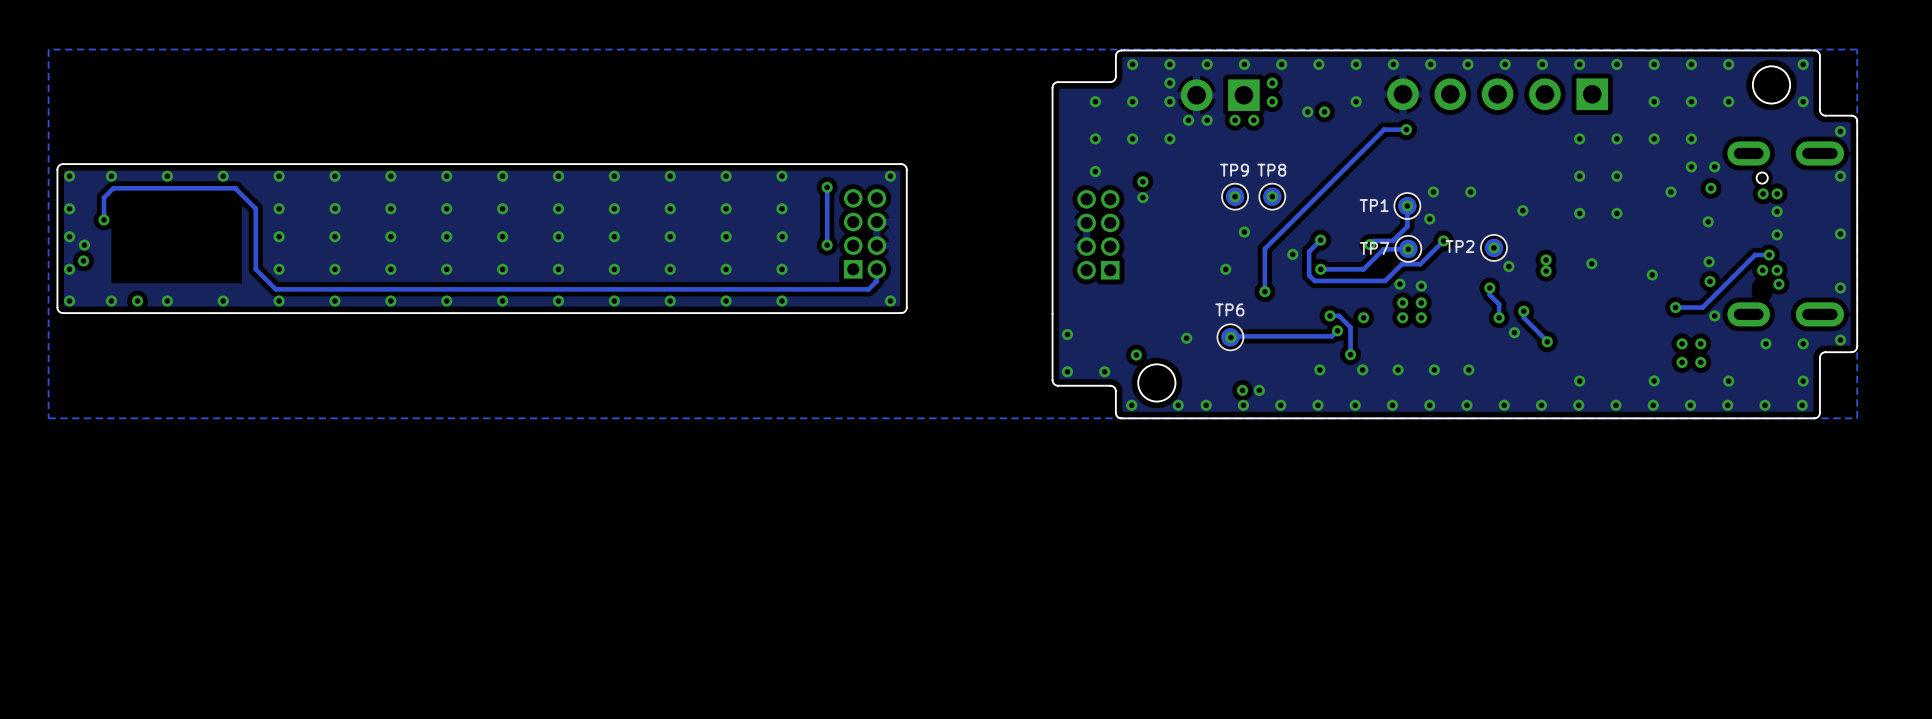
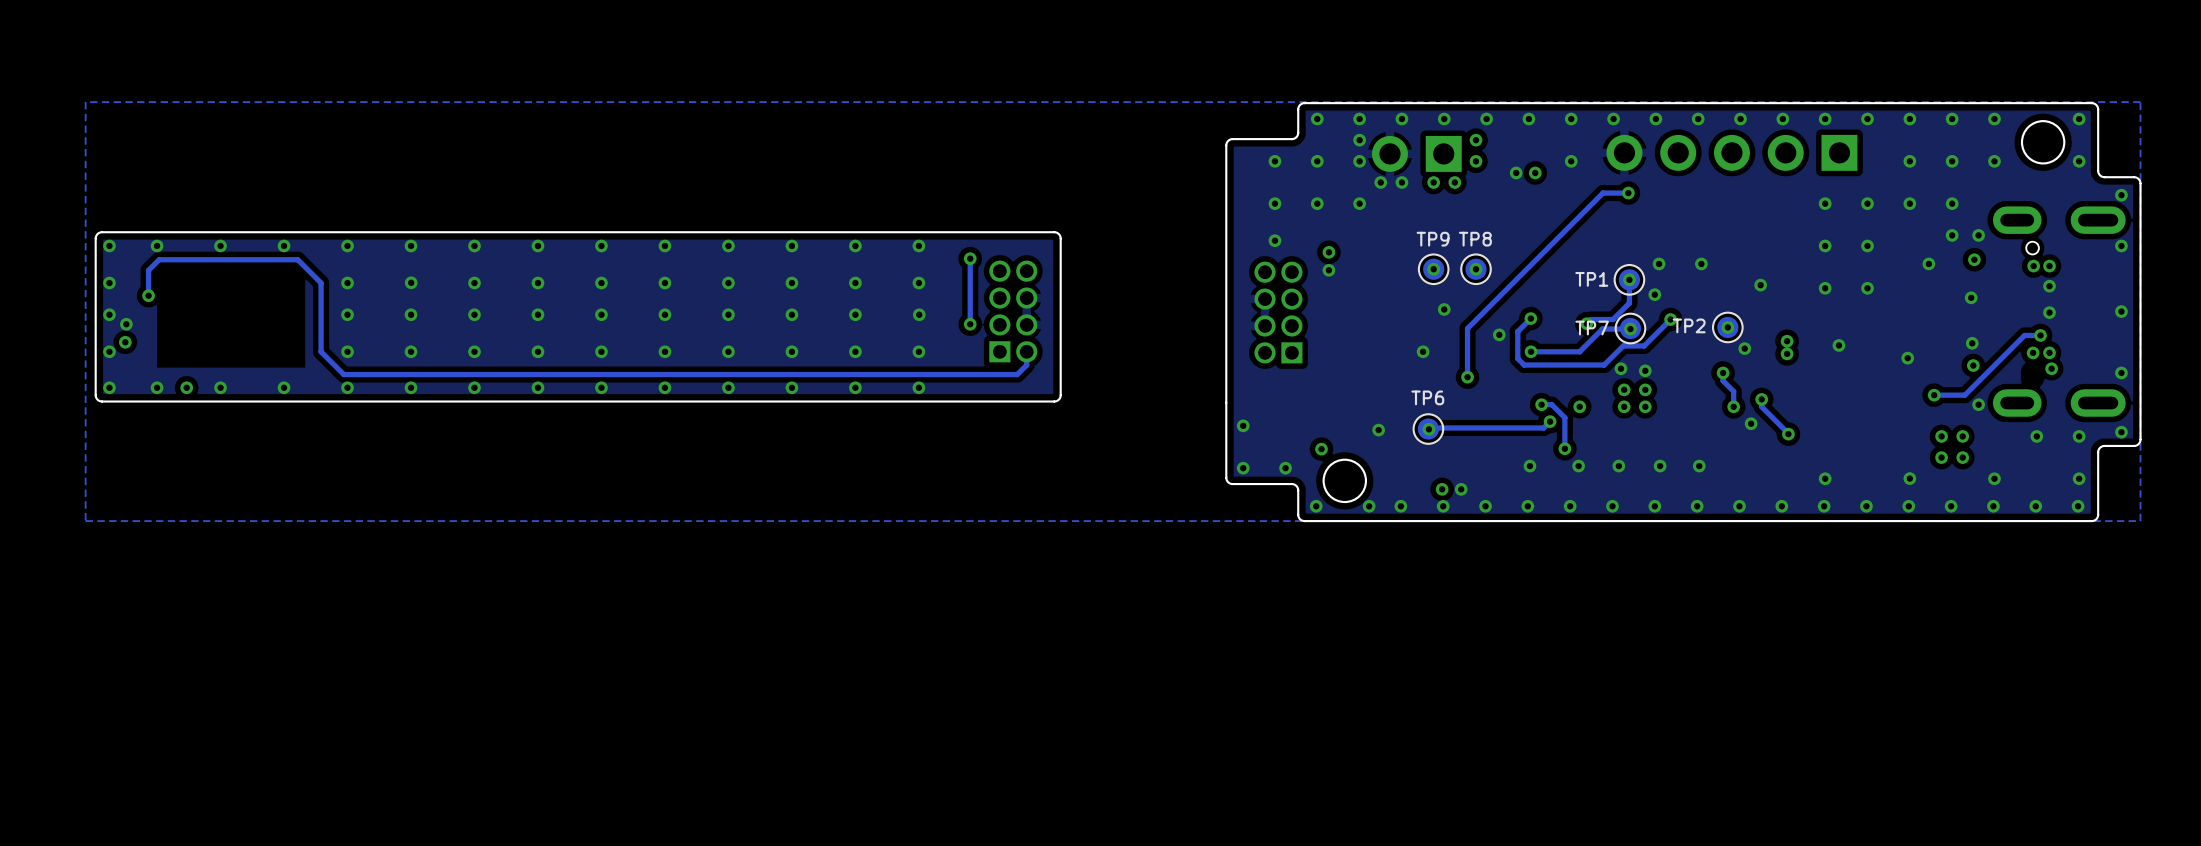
via: (890, 176) -> none
via: (890, 300) -> none

